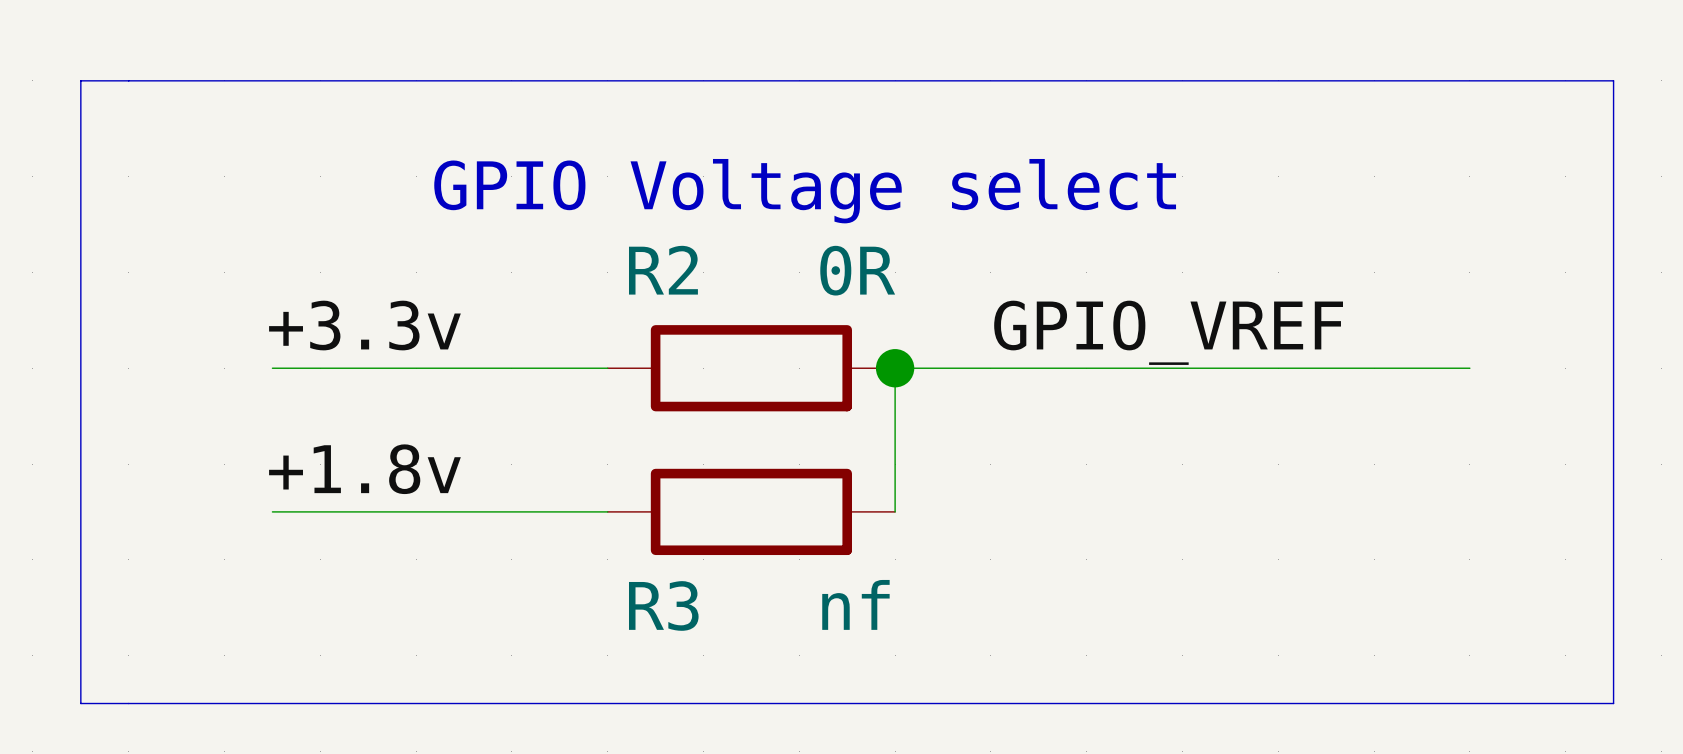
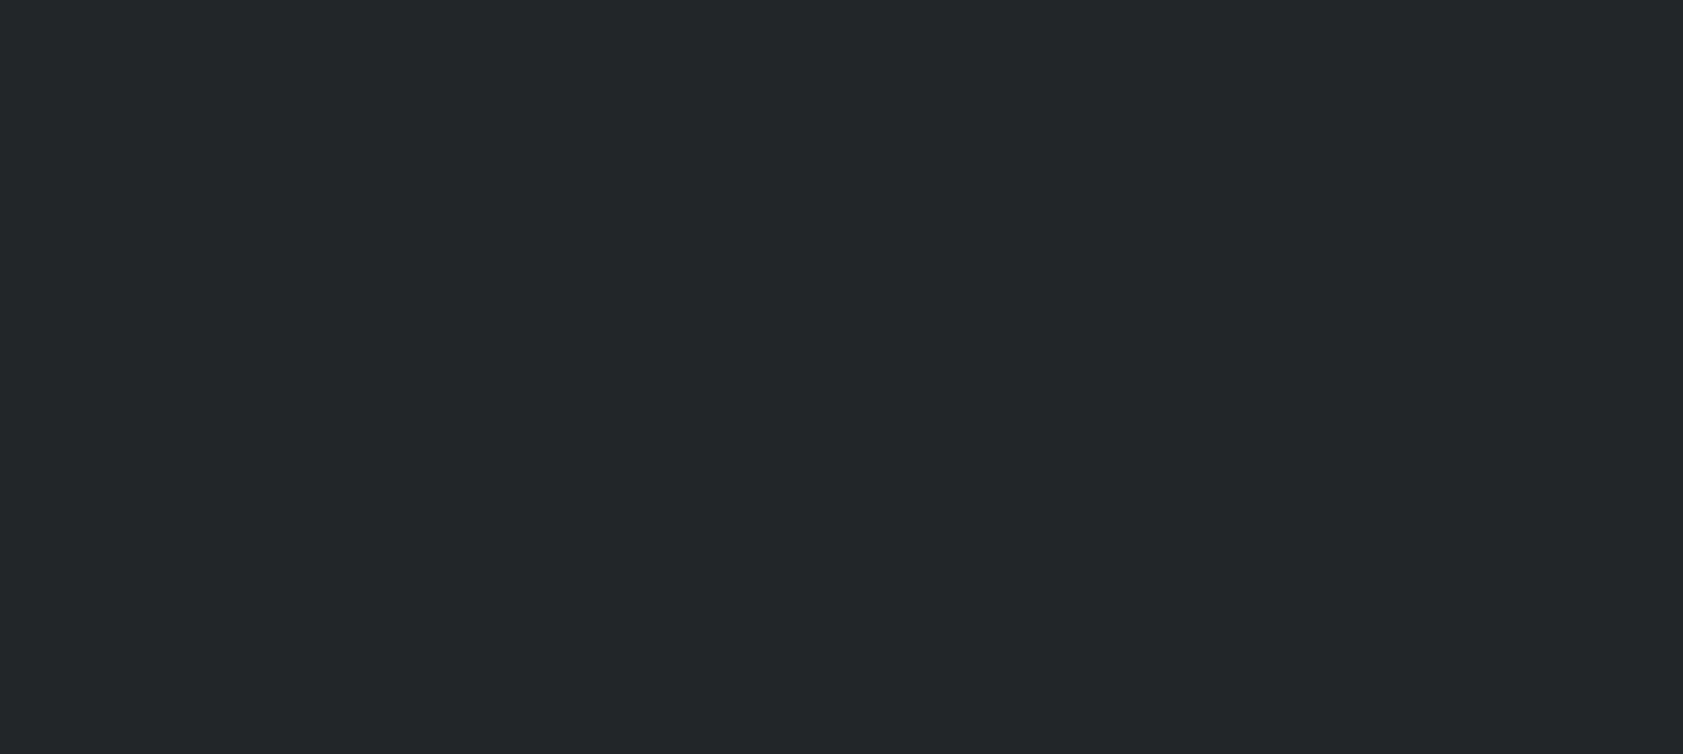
line: (80, 80) (1613, 80) (1613, 703) (80, 703) (80, 80) -> none
text: GPIO Voltage select (805, 191) -> none
label: +3.3v (364, 325) -> none
label: GPIO_VREF (1168, 332) -> none
wire: (272, 368) (607, 368) -> none
R2: 0R (751, 368) -> none
junction: (895, 368) -> none
wire: (1469, 368) (895, 368) (895, 511) -> none
label: +1.8v (364, 469) -> none
wire: (272, 511) (607, 511) -> none
R3: nf (751, 511) -> none

